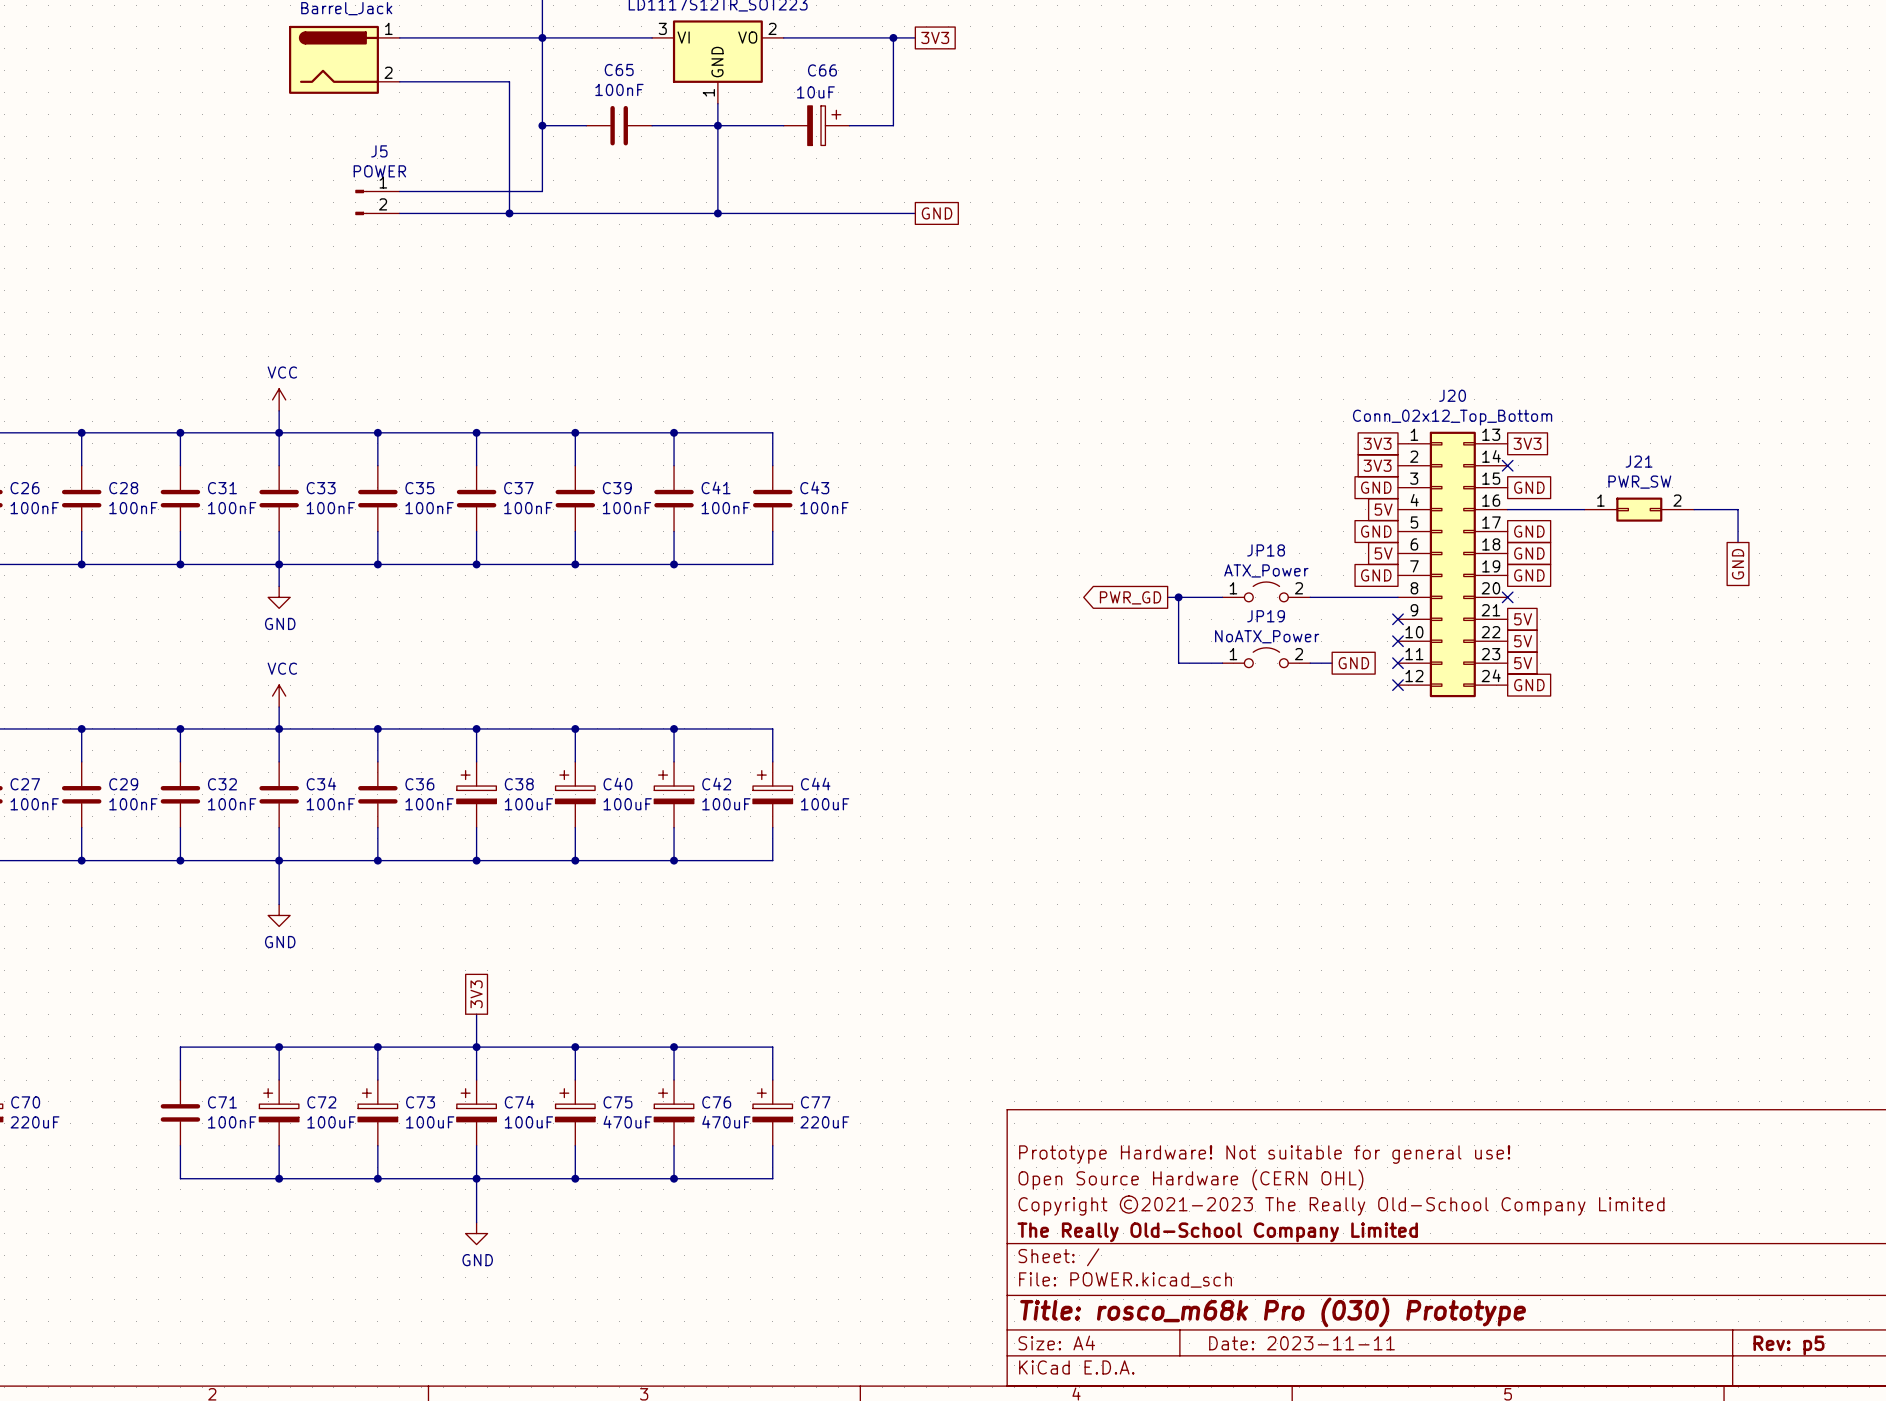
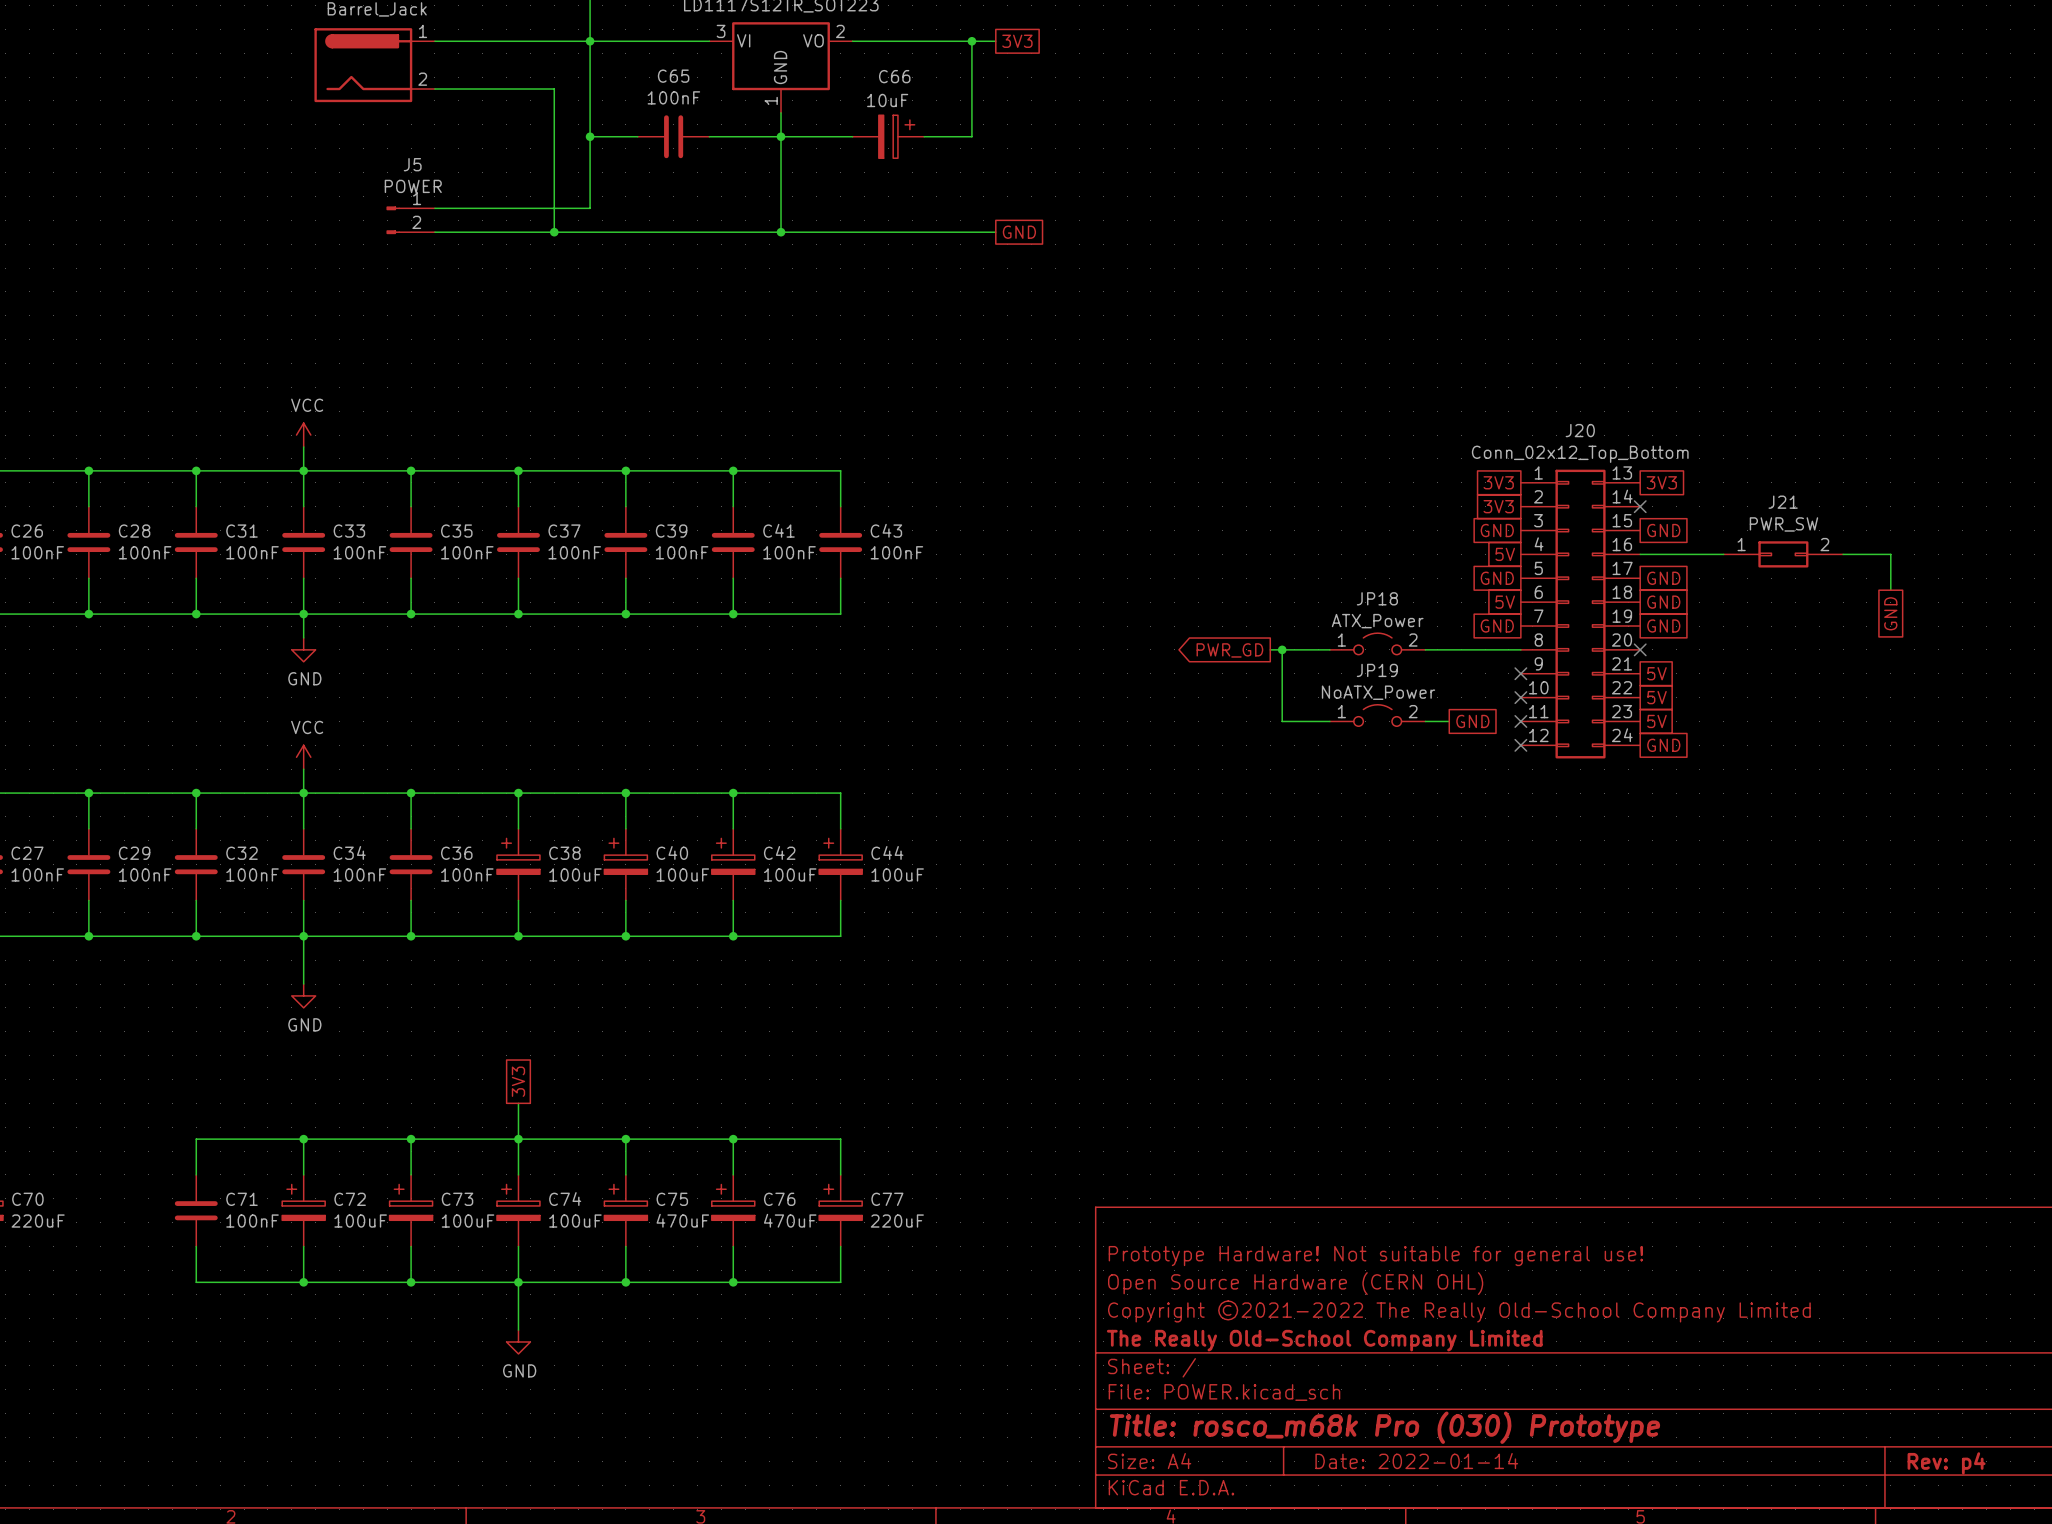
title block: Copyright ©2021-2023 The Really Old-School Company Limited (1341, 1205) -> Copyright ©2021-2022 The Really Old-School Company Limited (1459, 1311)
title block: Date: 2023-11-11 (1301, 1343) -> Date: 2022-01-14 (1416, 1461)
title block: Rev: p5 (1788, 1345) -> Rev: p4 (1946, 1463)

